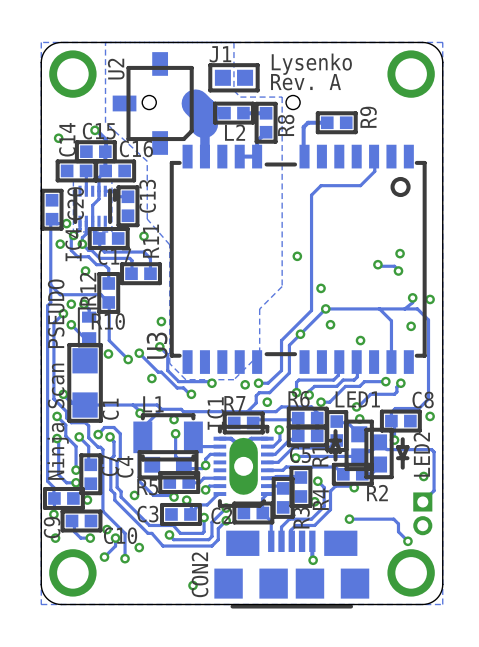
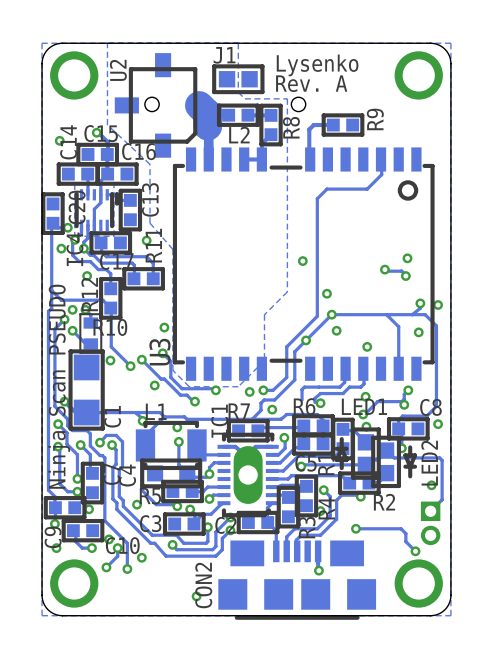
track: (385, 381) (364, 381) (359, 386) (345, 386) (329, 402) (321, 402) -> none
via: (385, 381) -> none
via: none -> (365, 396)
via: (296, 392) -> none
via: (309, 395) -> none
via: none -> (320, 403)
via: none -> (404, 404)
via: (321, 402) -> none

